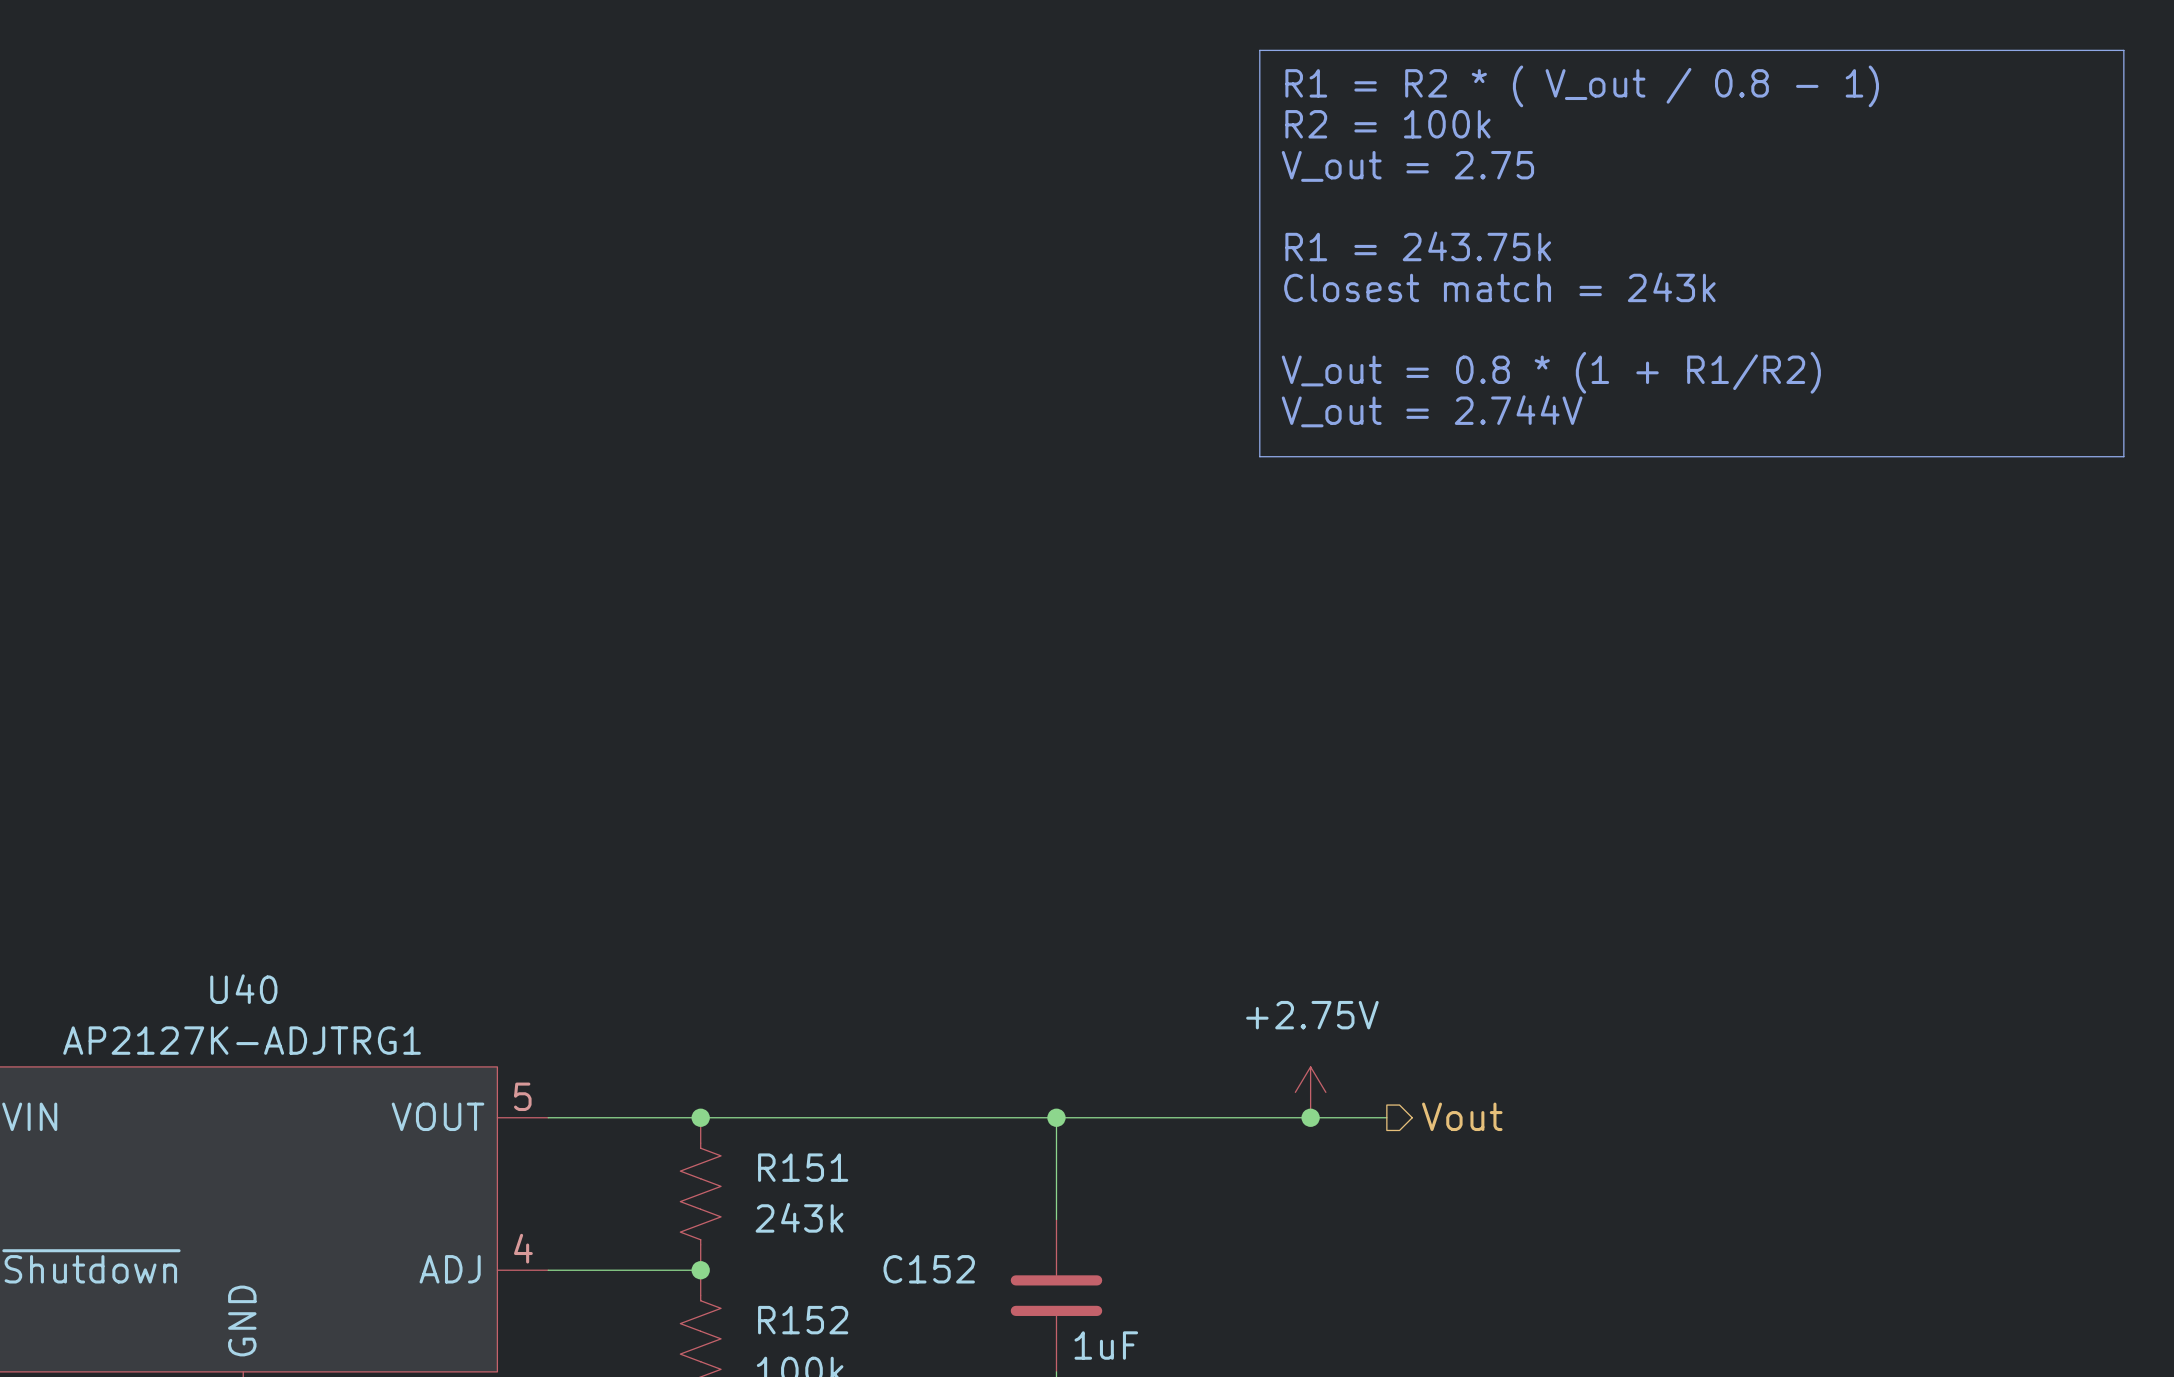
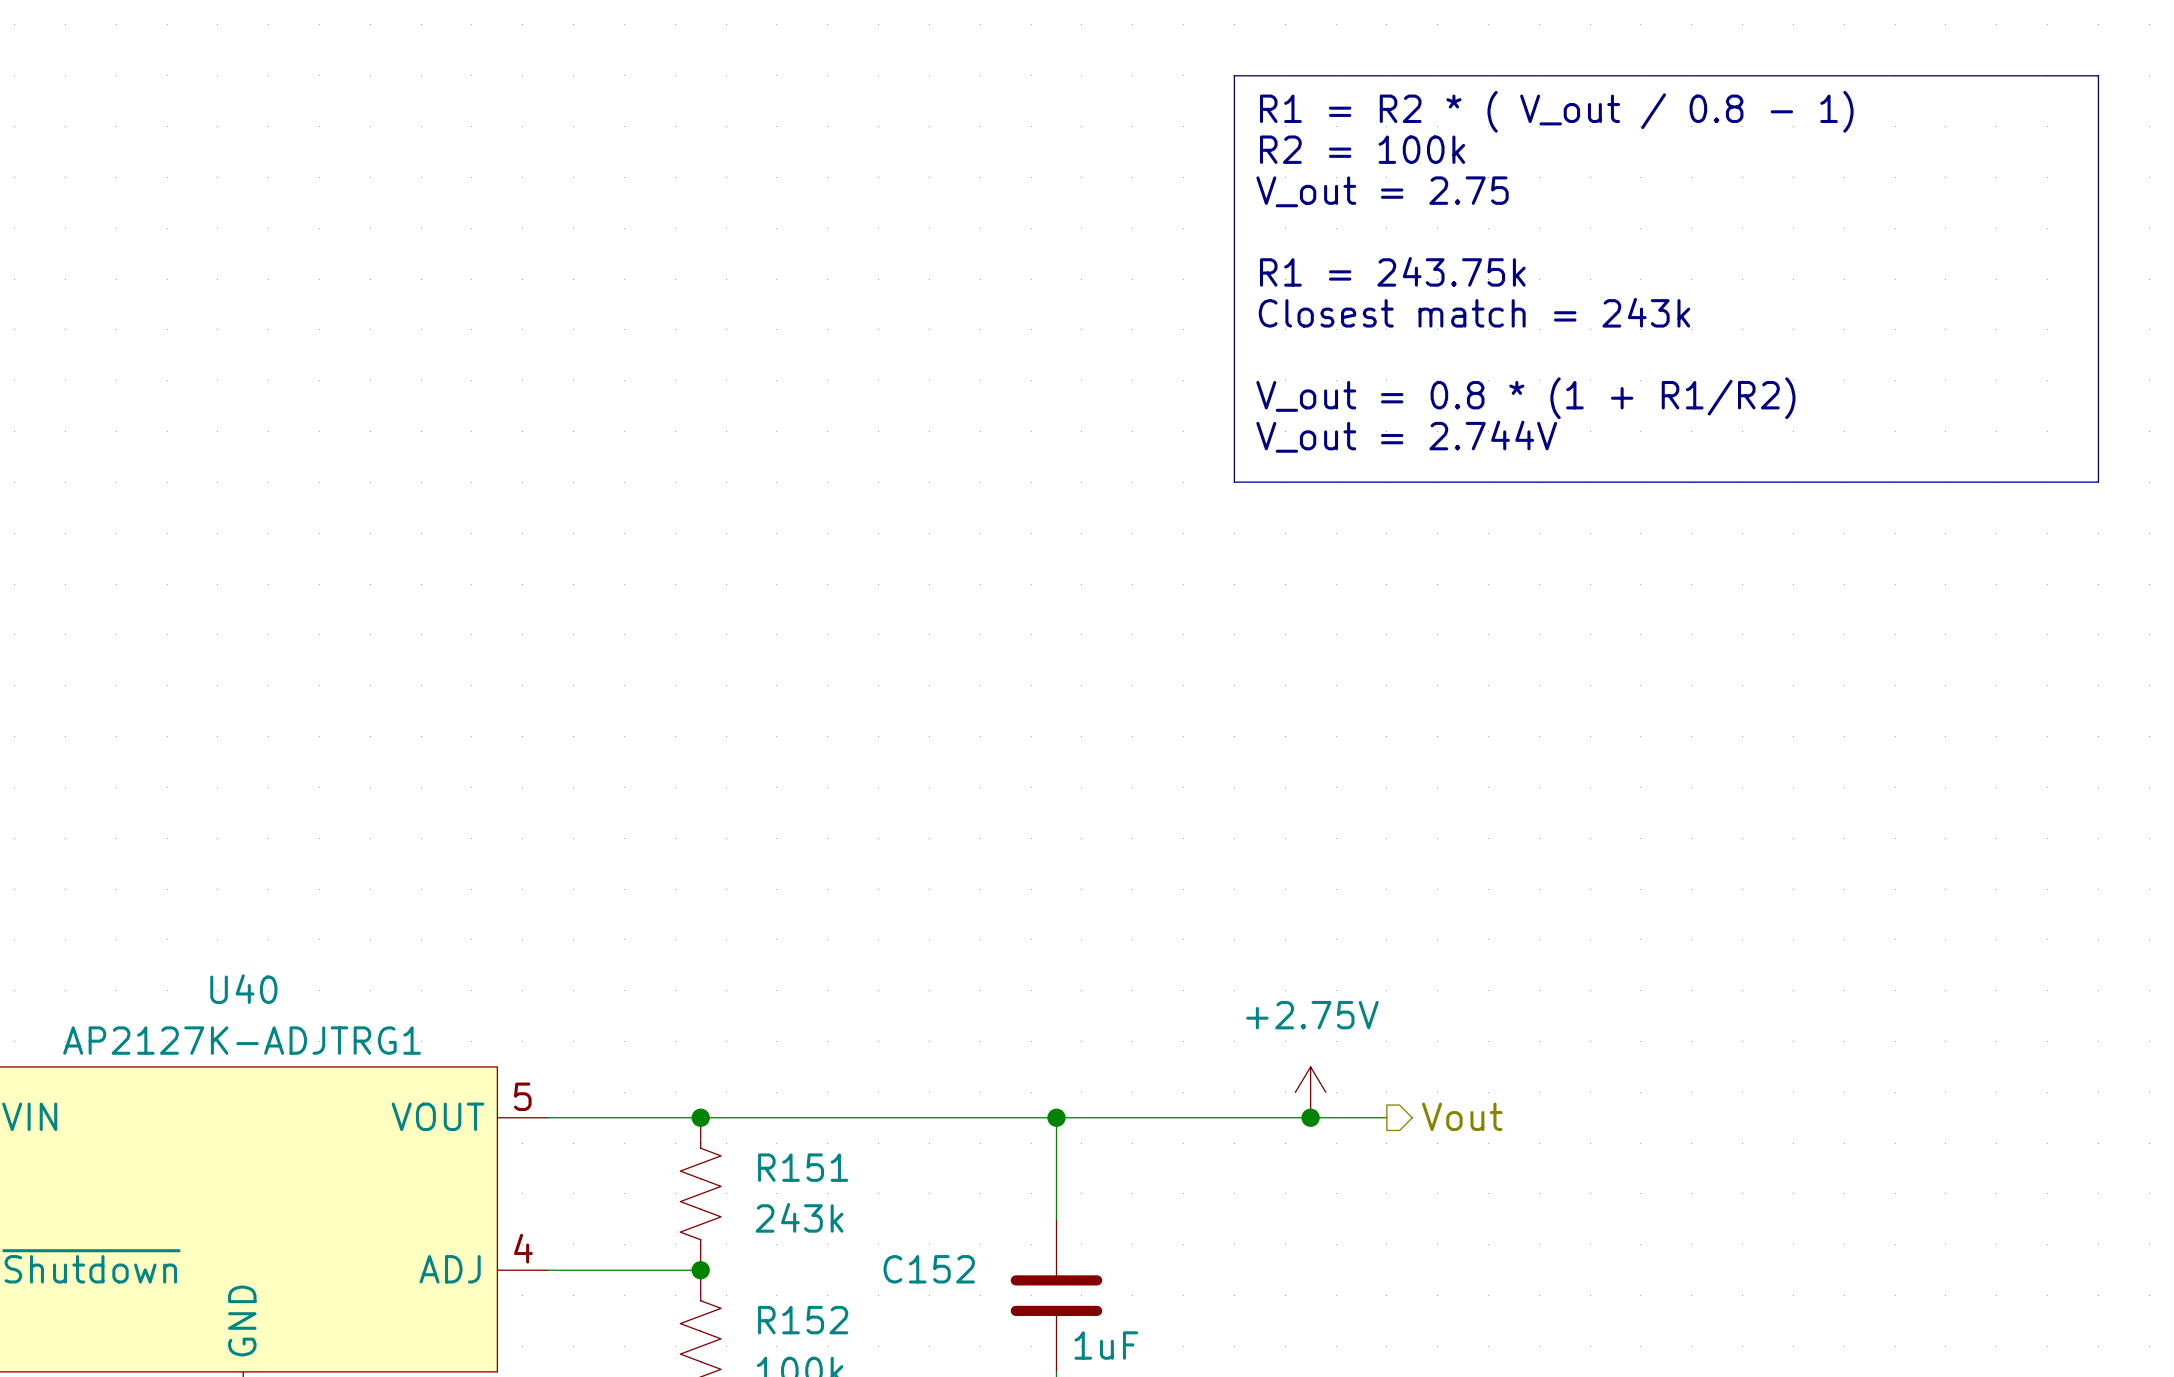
line: (1259, 50) (2123, 50) (2123, 456) (1259, 456) (1259, 50) -> (1234, 75) (2098, 75) (2098, 482) (1234, 482) (1234, 75)
text position: R1 = R2 * ( V_out / 0.8 - 1) (1582, 86) -> R1 = R2 * ( V_out / 0.8 - 1) (1556, 111)
text position: R2 = 100k (1387, 124) -> R2 = 100k (1362, 149)
text position: V_out = 2.75 (1407, 166) -> V_out = 2.75 (1382, 191)
text position: R1 = 243.75k (1418, 246) -> R1 = 243.75k (1392, 271)
text position: Closest match = 243k (1499, 287) -> Closest match = 243k (1474, 312)
text position: V_out = 0.8 * (1 + R1/R2) (1551, 372) -> V_out = 0.8 * (1 + R1/R2) (1525, 398)
text position: V_out = 2.744V (1432, 411) -> V_out = 2.744V (1406, 436)

